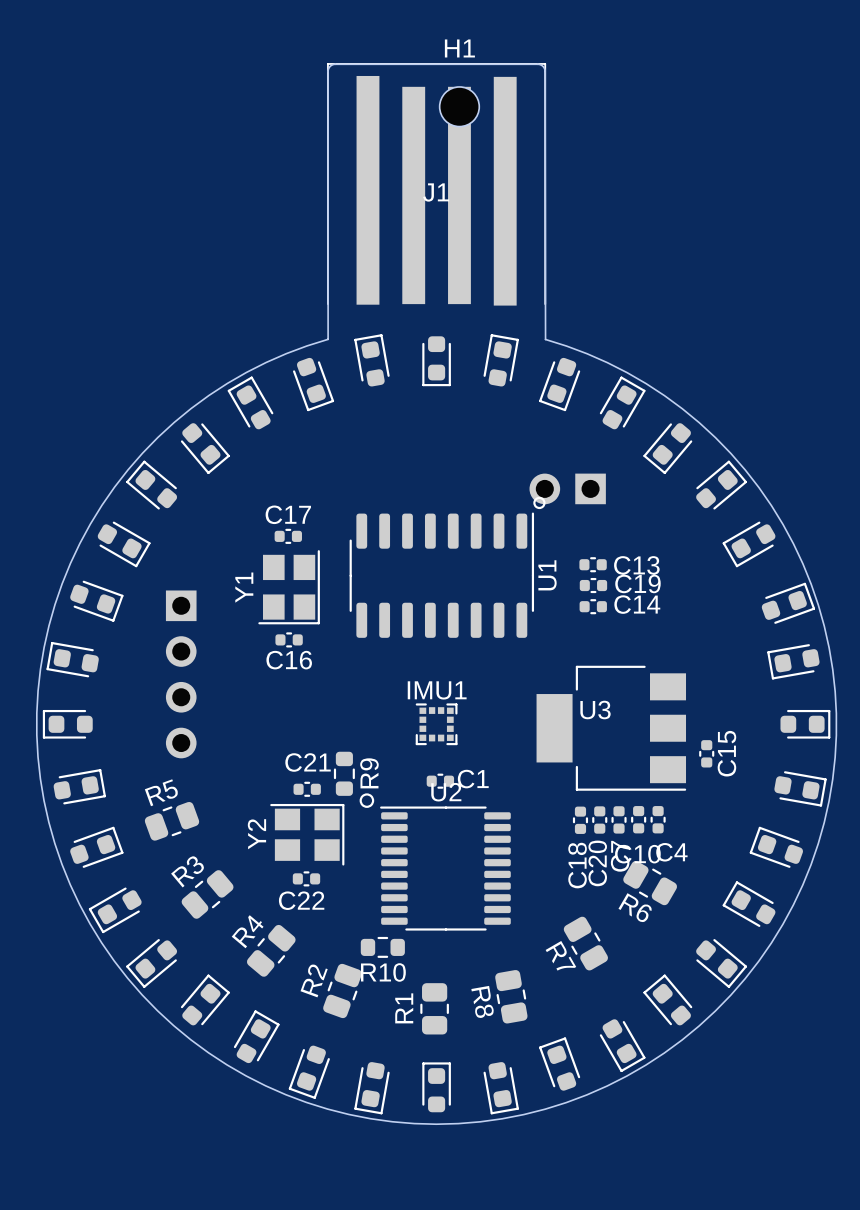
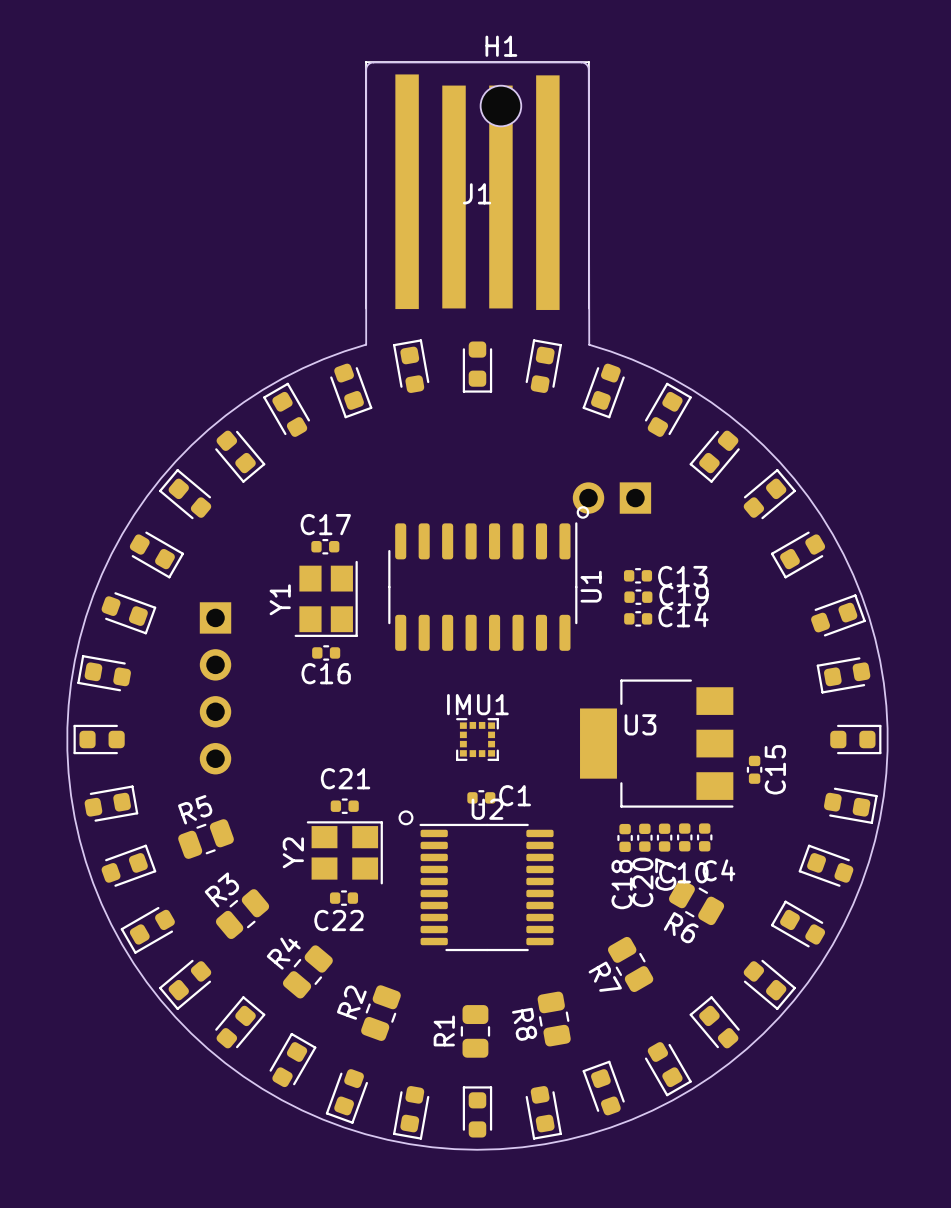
R9: (344, 773) -> none
R10: (382, 947) -> none

